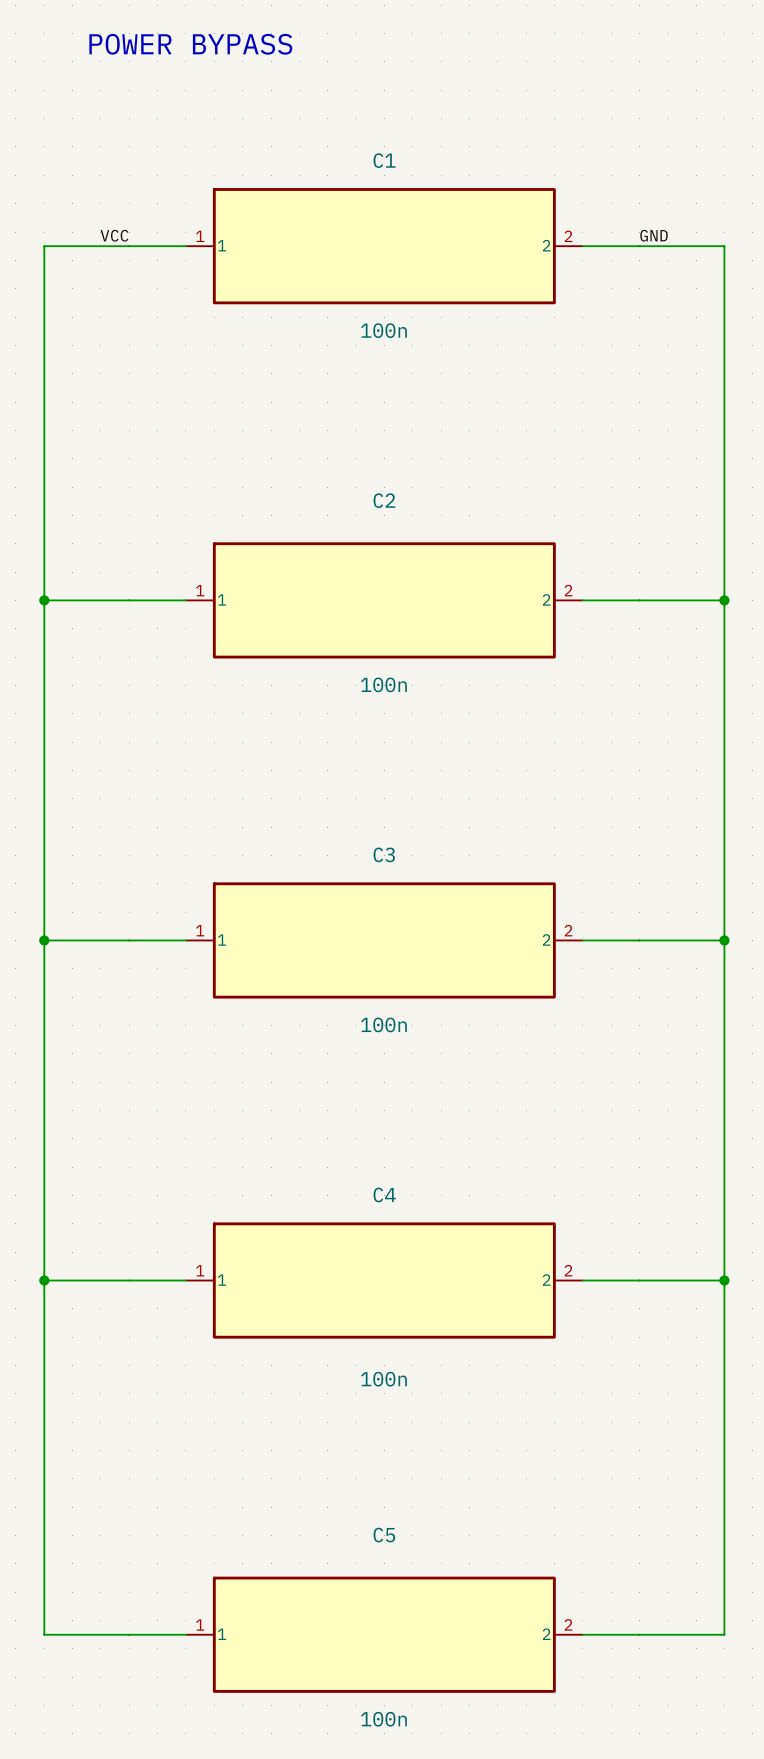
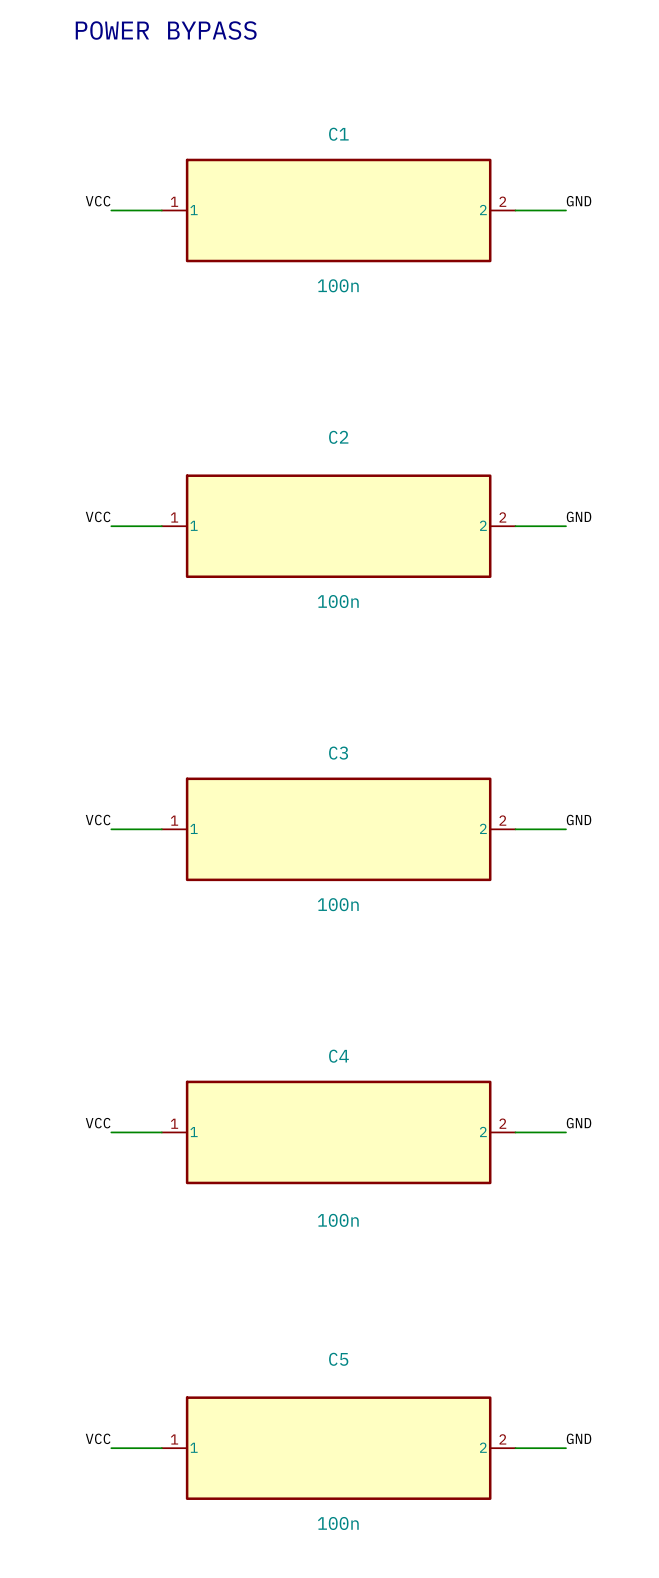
wire: (129, 246) (44, 246) (44, 1634) (129, 1634) -> none
wire: (639, 246) (724, 246) (724, 1634) (639, 1634) -> none
label: none -> VCC (98, 516)
label: none -> GND (579, 516)
wire: (44, 600) (129, 600) -> none
junction: (44, 600) -> none
wire: (639, 600) (724, 600) -> none
junction: (724, 600) -> none
label: none -> VCC (98, 820)
label: none -> GND (579, 820)
wire: (44, 940) (129, 940) -> none
junction: (44, 940) -> none
wire: (639, 940) (724, 940) -> none
junction: (724, 940) -> none
label: none -> VCC (98, 1123)
label: none -> GND (579, 1123)
wire: (44, 1280) (129, 1280) -> none
junction: (44, 1280) -> none
wire: (639, 1280) (724, 1280) -> none
junction: (724, 1280) -> none
label: none -> VCC (98, 1438)
label: none -> GND (579, 1438)

